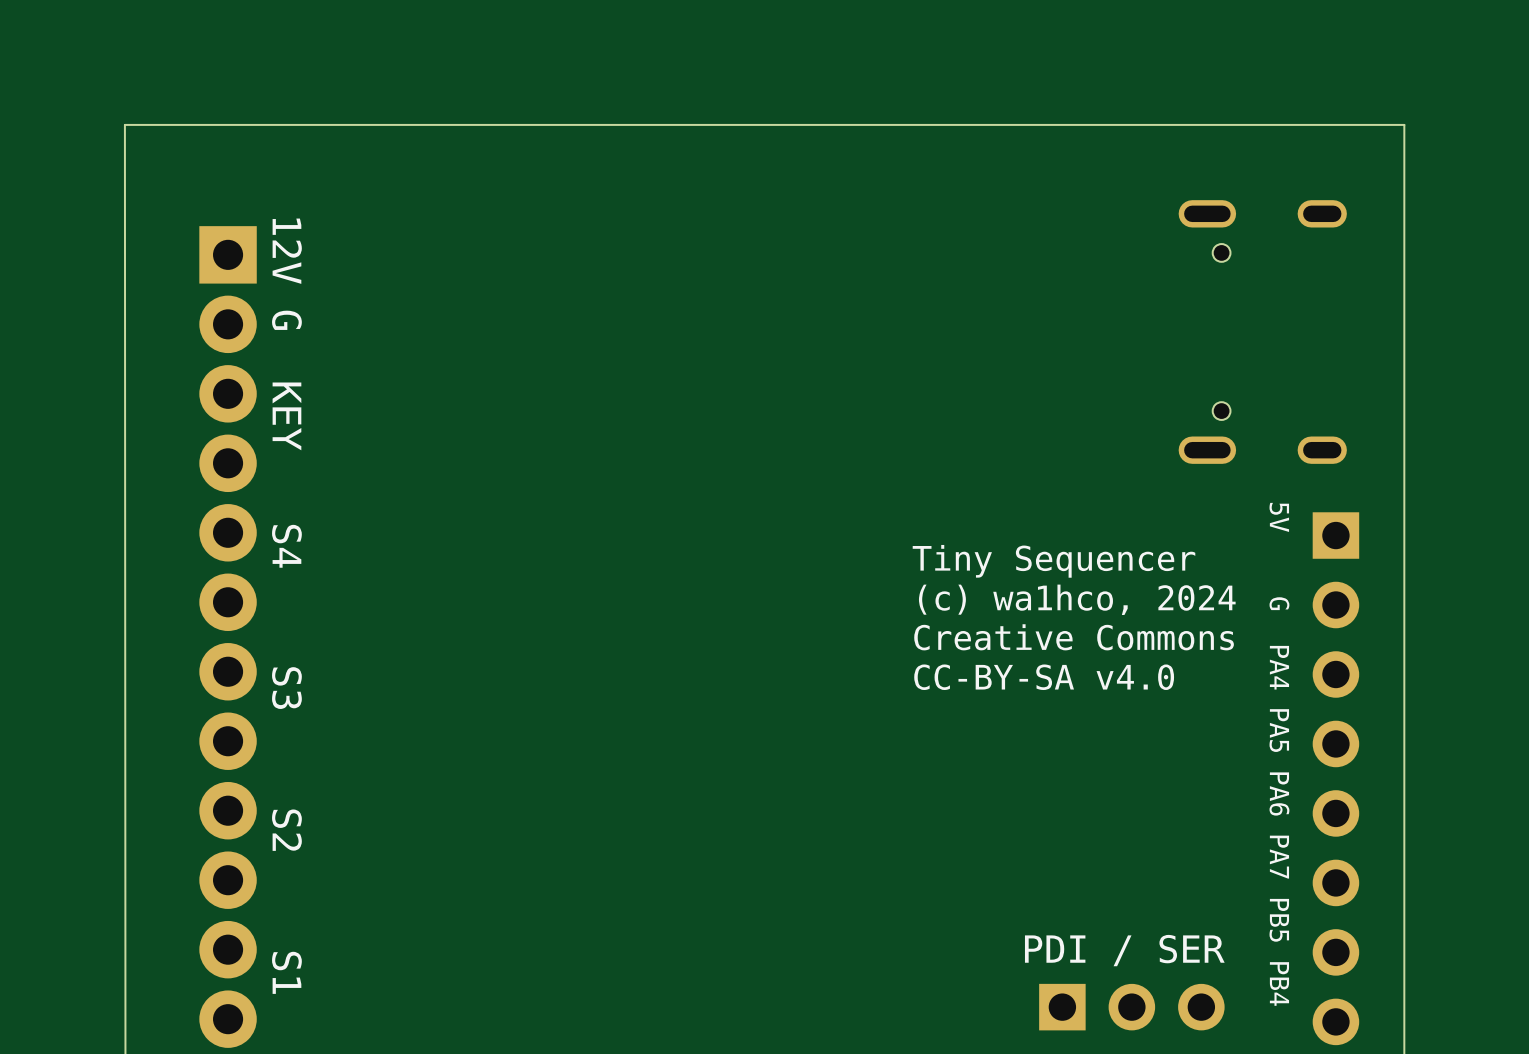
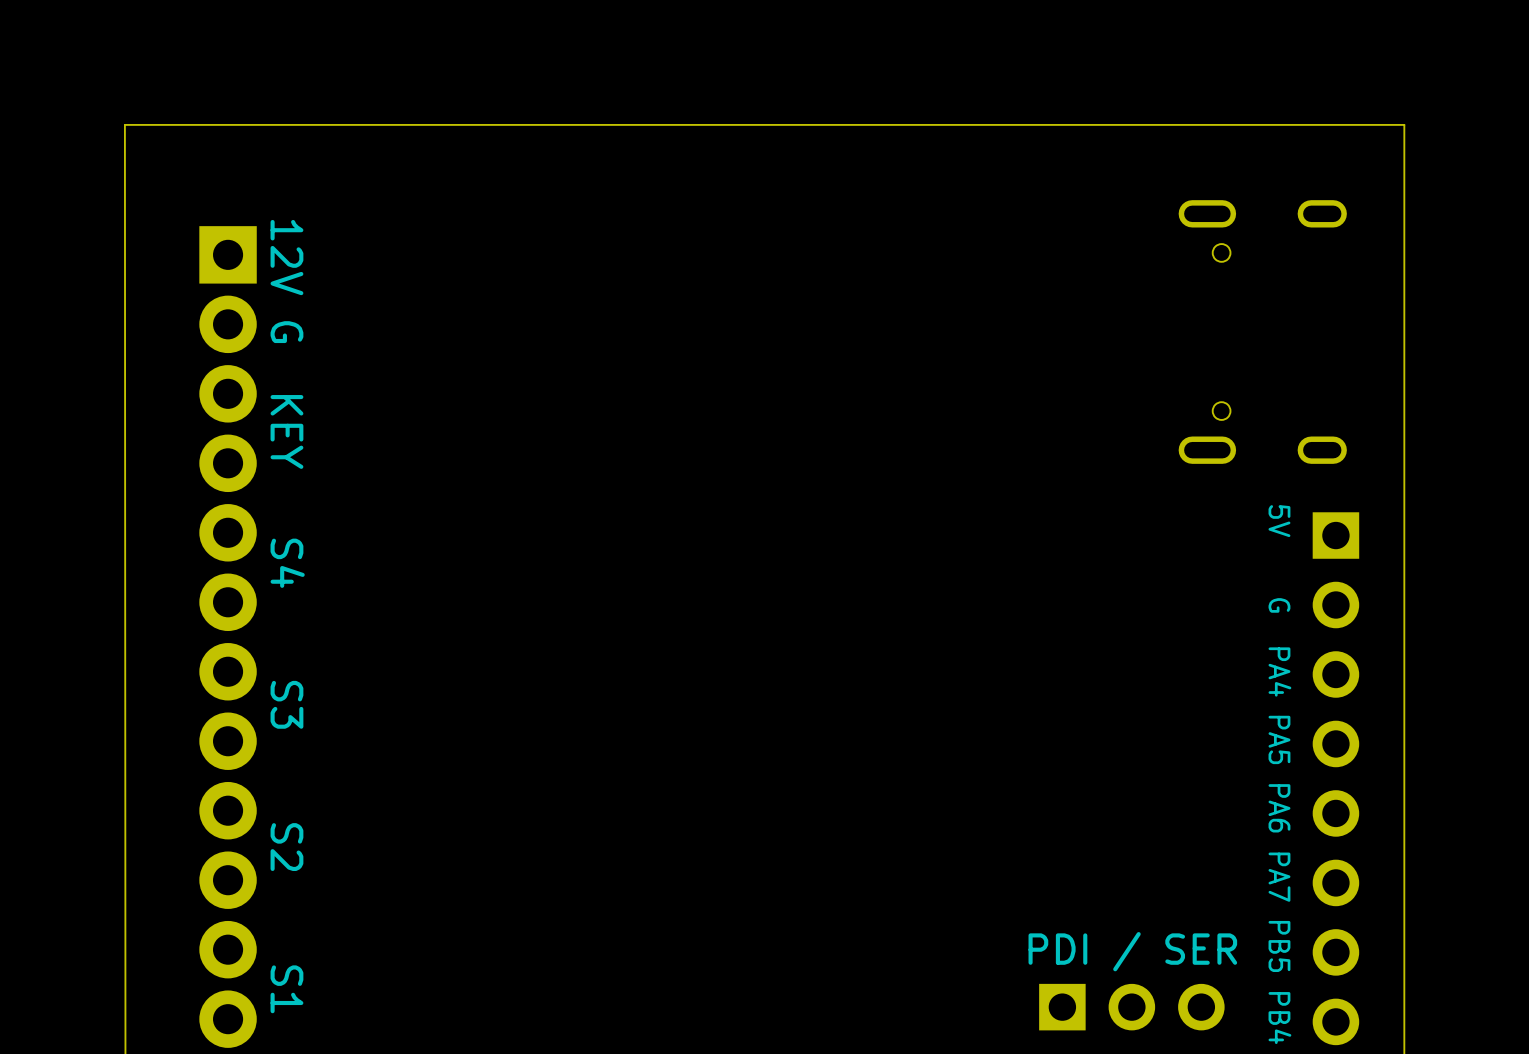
text: Tiny Sequencer (1053, 561) -> none
text: (c) wa1hco, 2024 (1077, 599) -> none
text: Creative Commons (1074, 637) -> none
text: CC-BY-SA v4.0 (1044, 677) -> none

